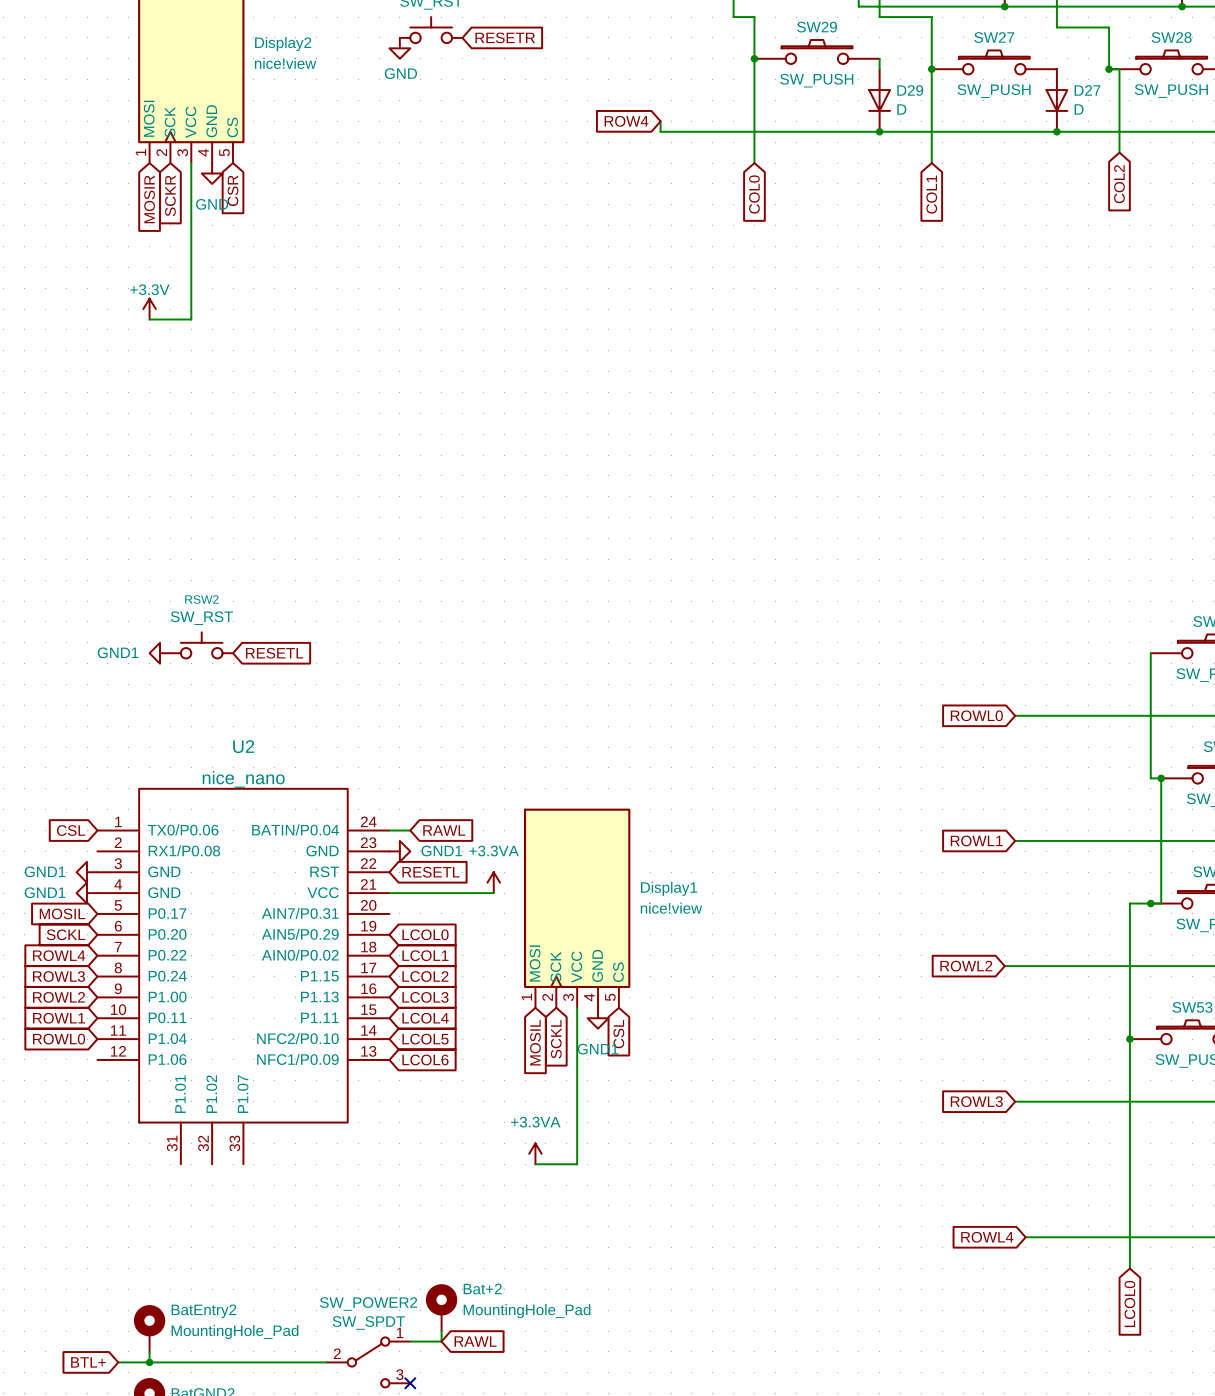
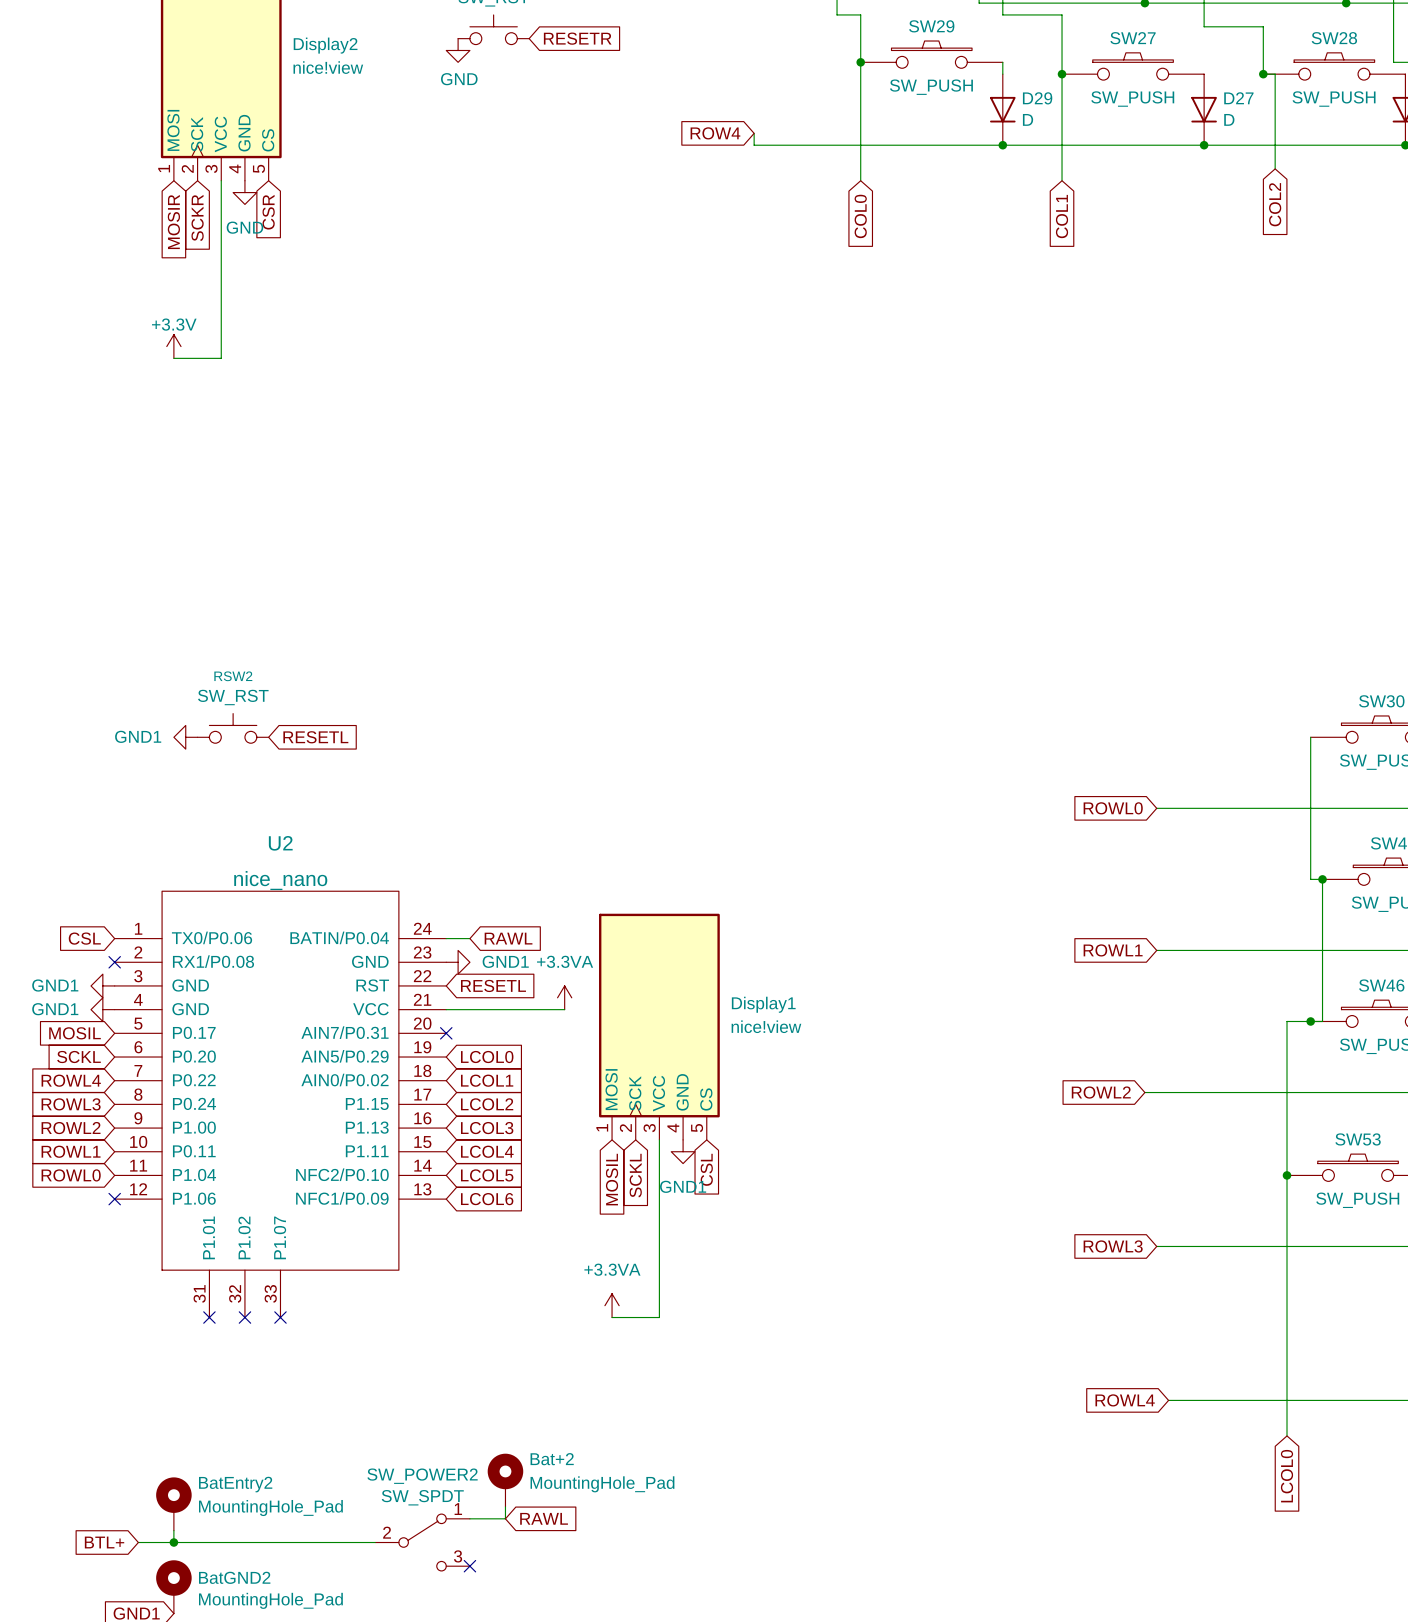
no-connect mark: none -> (114, 962)
no-connect mark: none -> (446, 1033)
no-connect mark: none -> (114, 1199)
no-connect mark: none -> (209, 1317)
no-connect mark: none -> (244, 1317)
no-connect mark: none -> (280, 1317)

